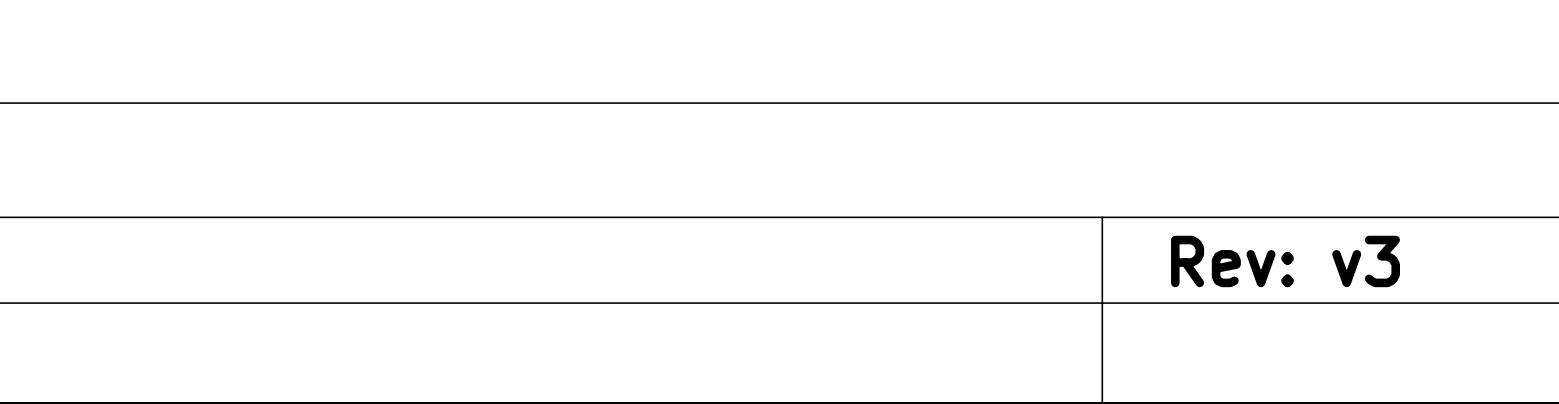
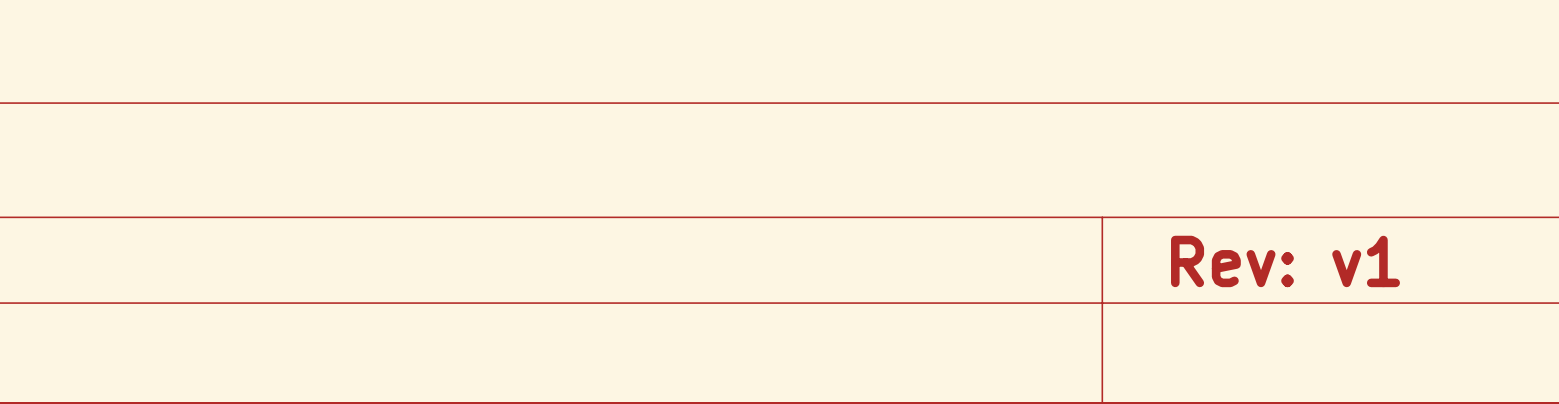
title block: Rev: v3 (1285, 261) -> Rev: v1 (1285, 261)

